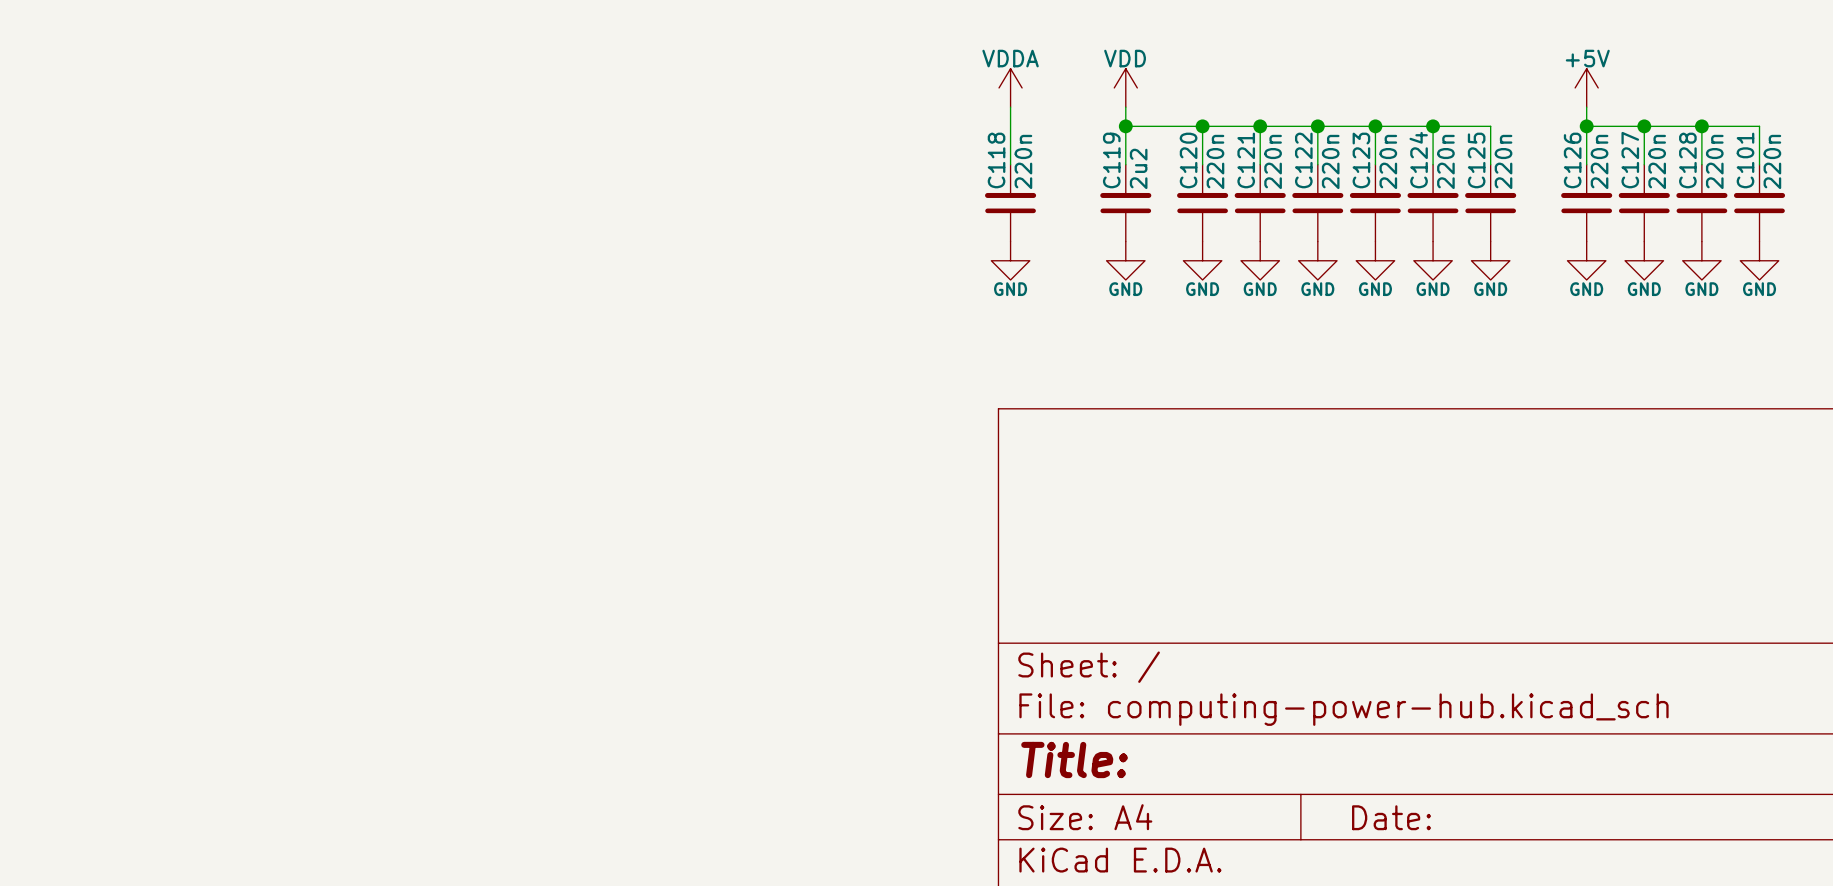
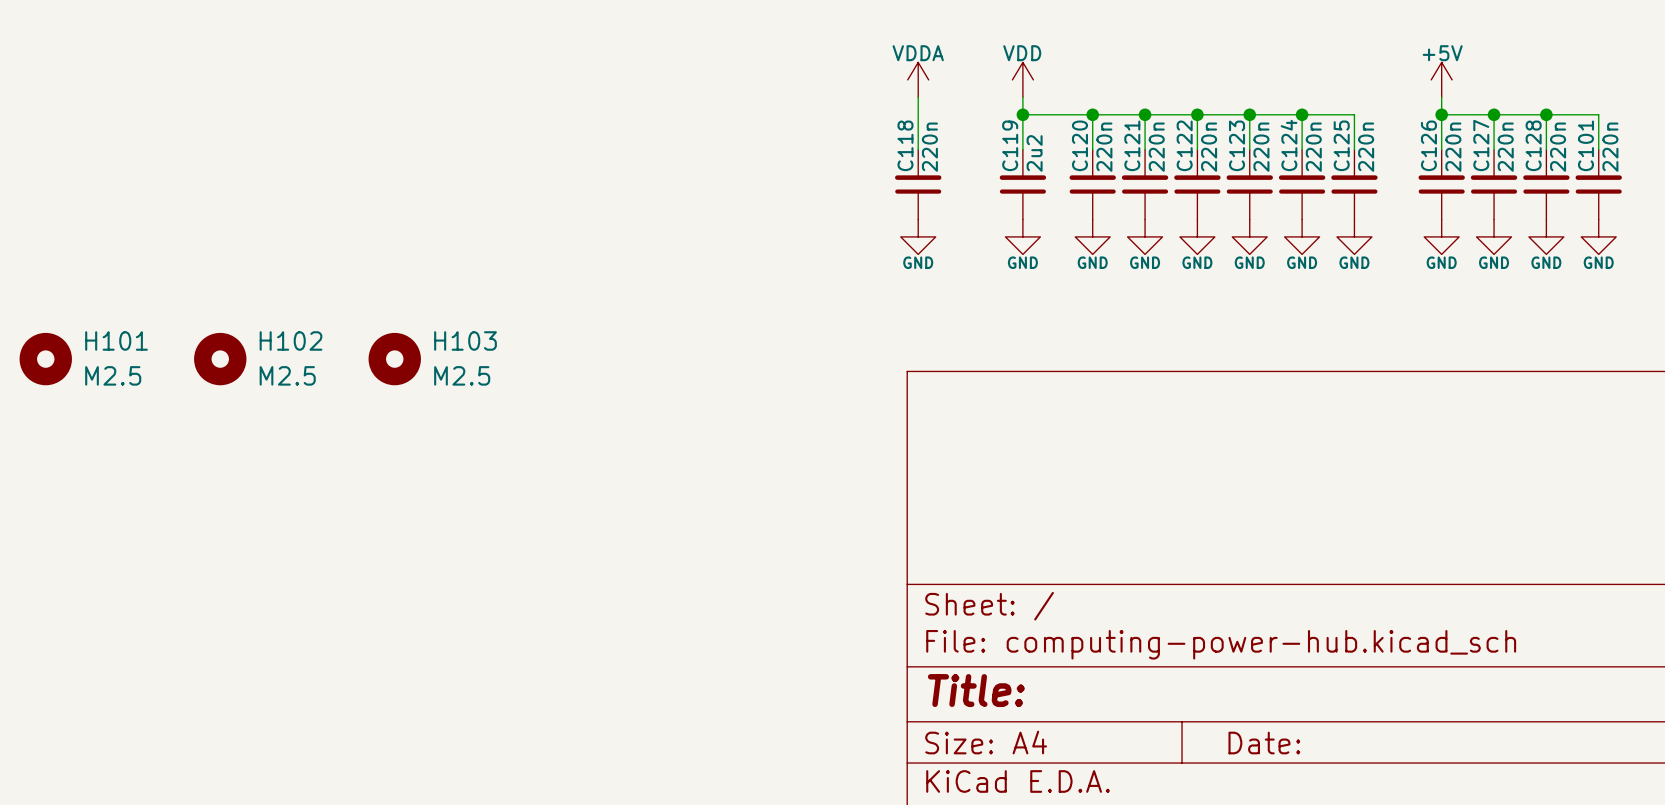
H101: none -> M2.5 (45, 359)
H102: none -> M2.5 (220, 359)
H103: none -> M2.5 (394, 359)

